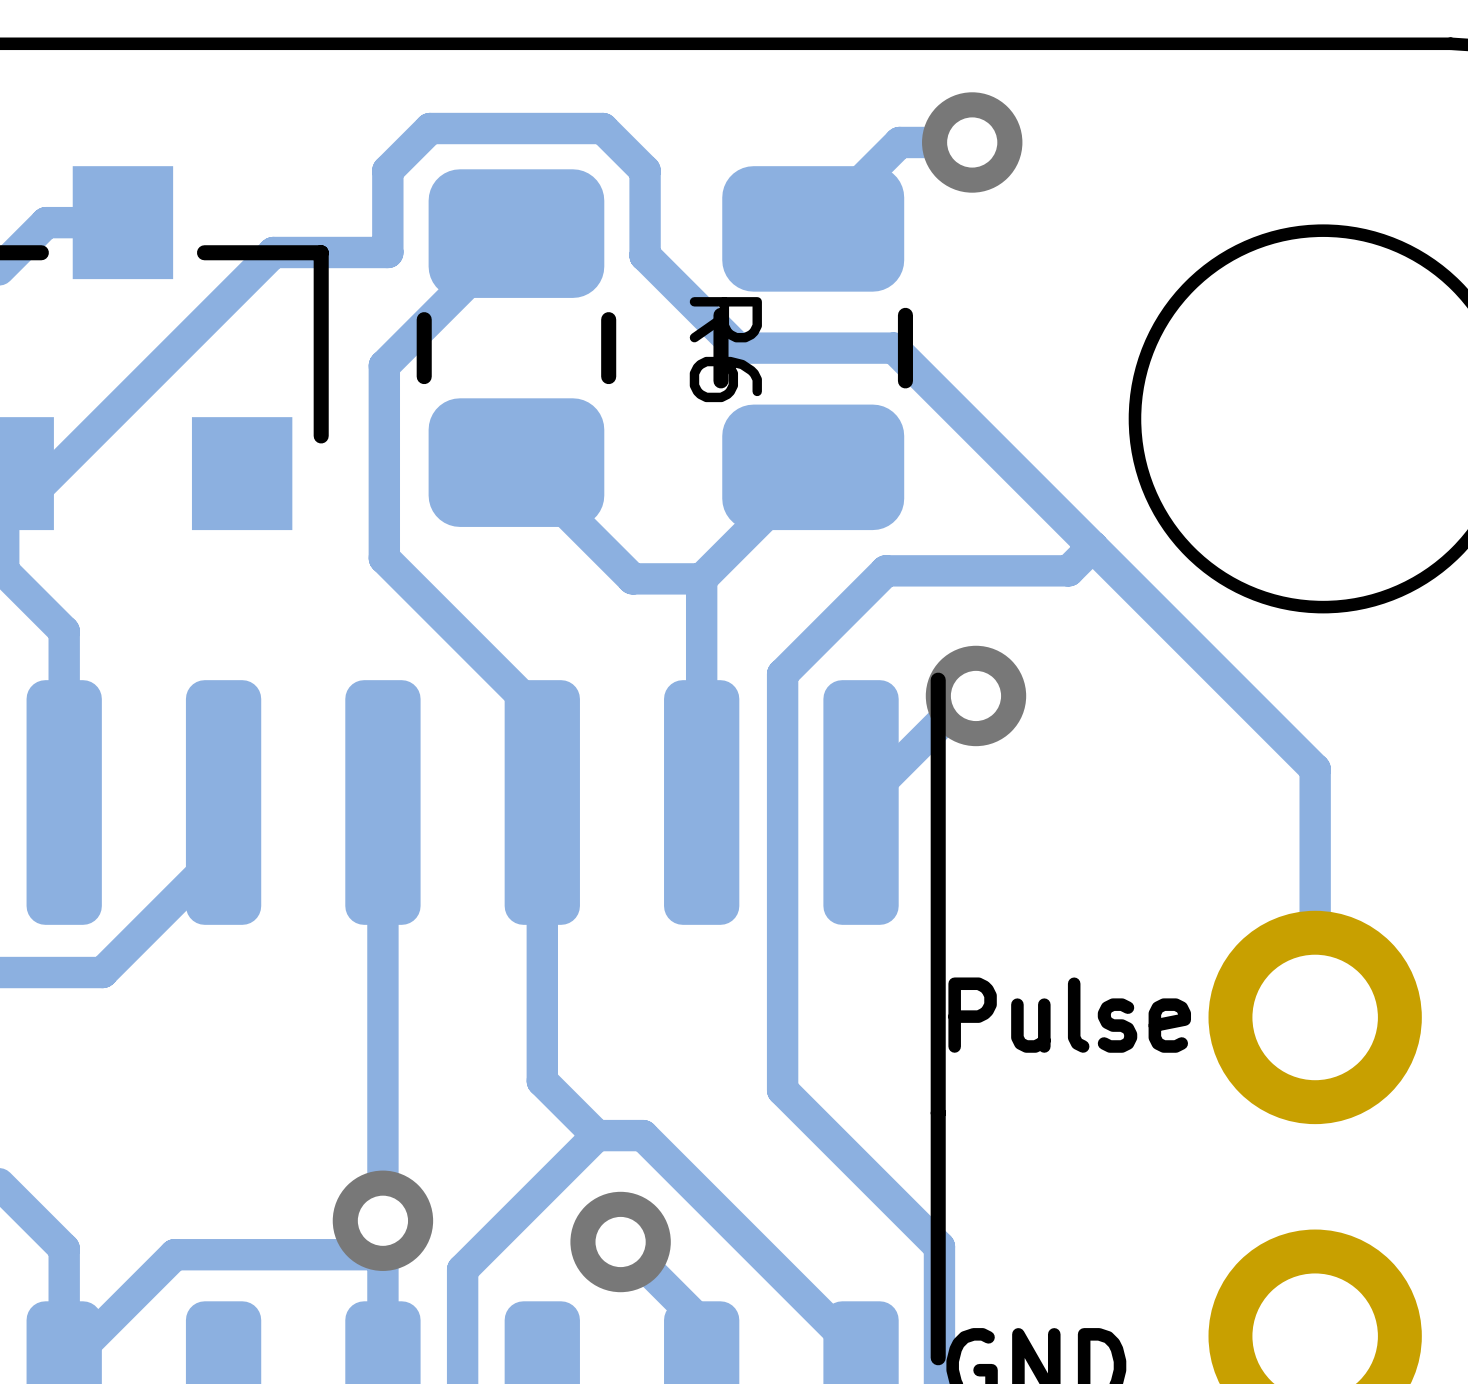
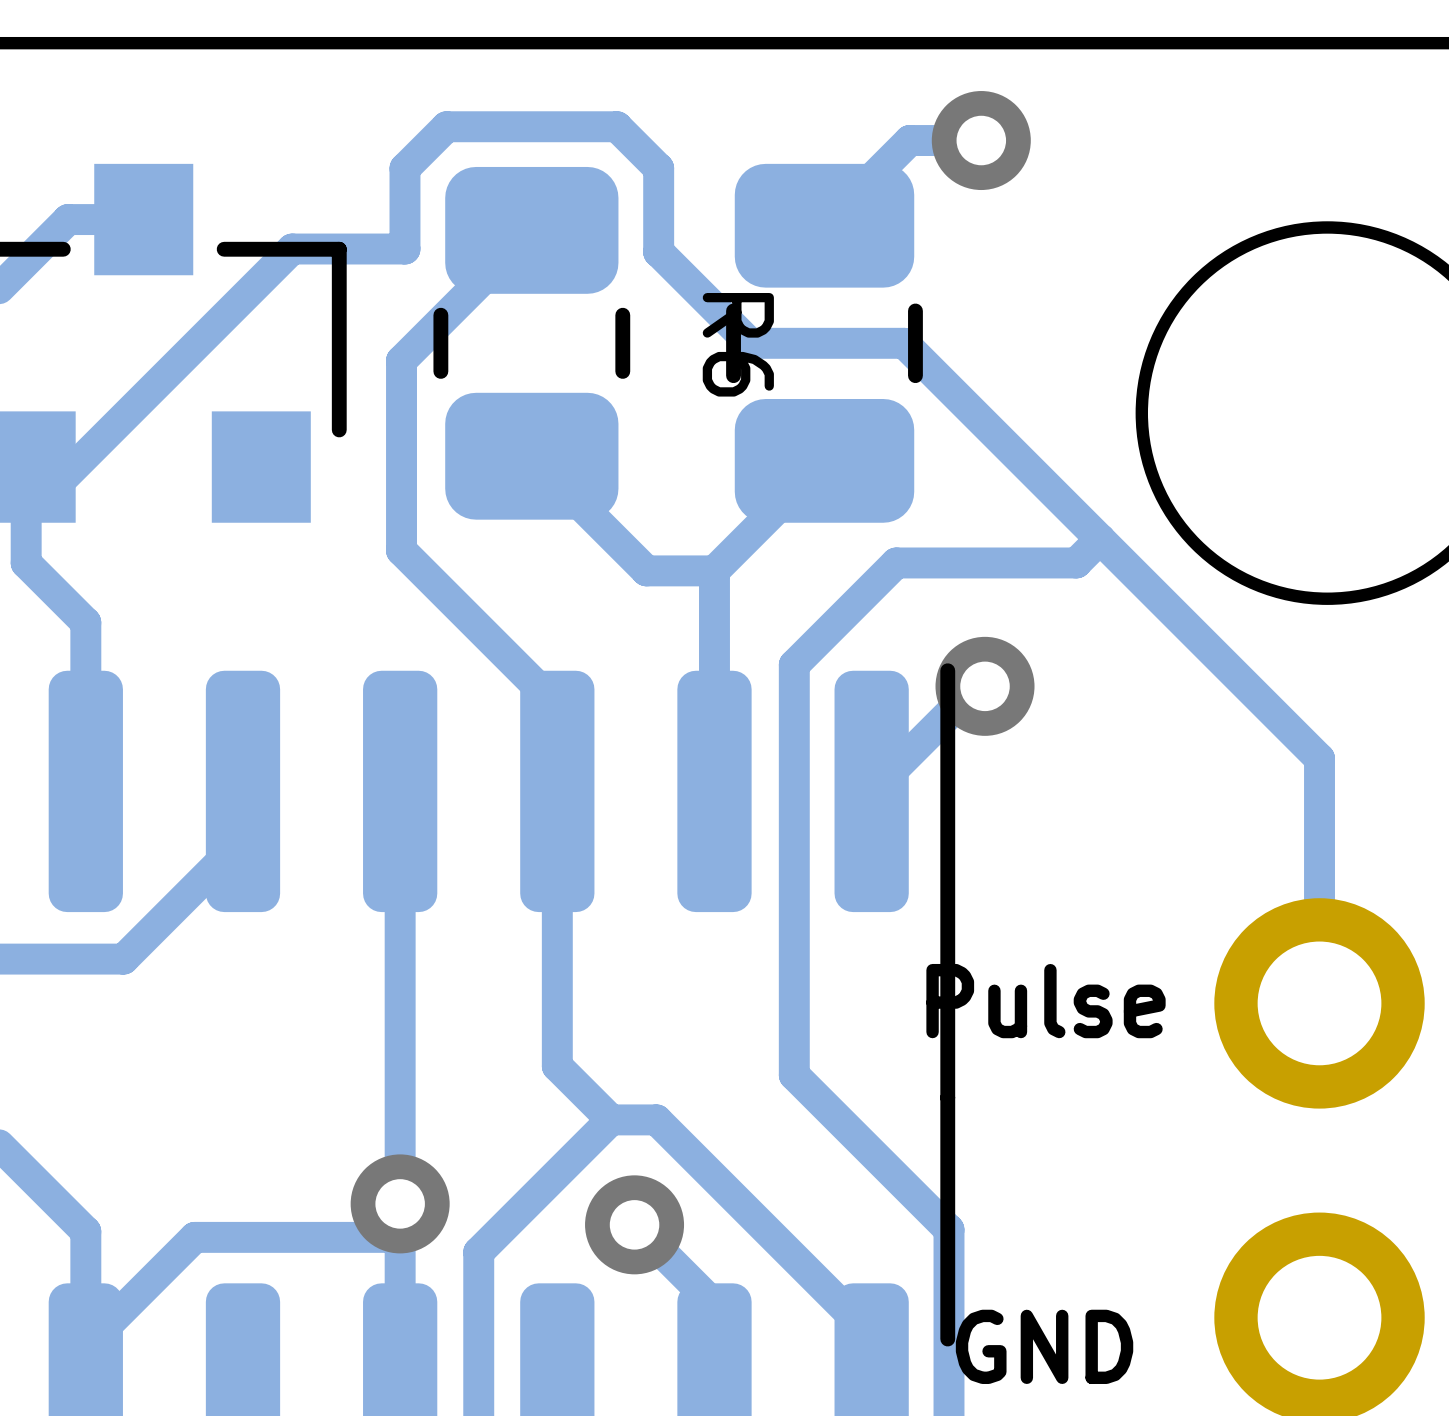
text position: Pulse (1069, 1015) -> Pulse (1046, 1001)

